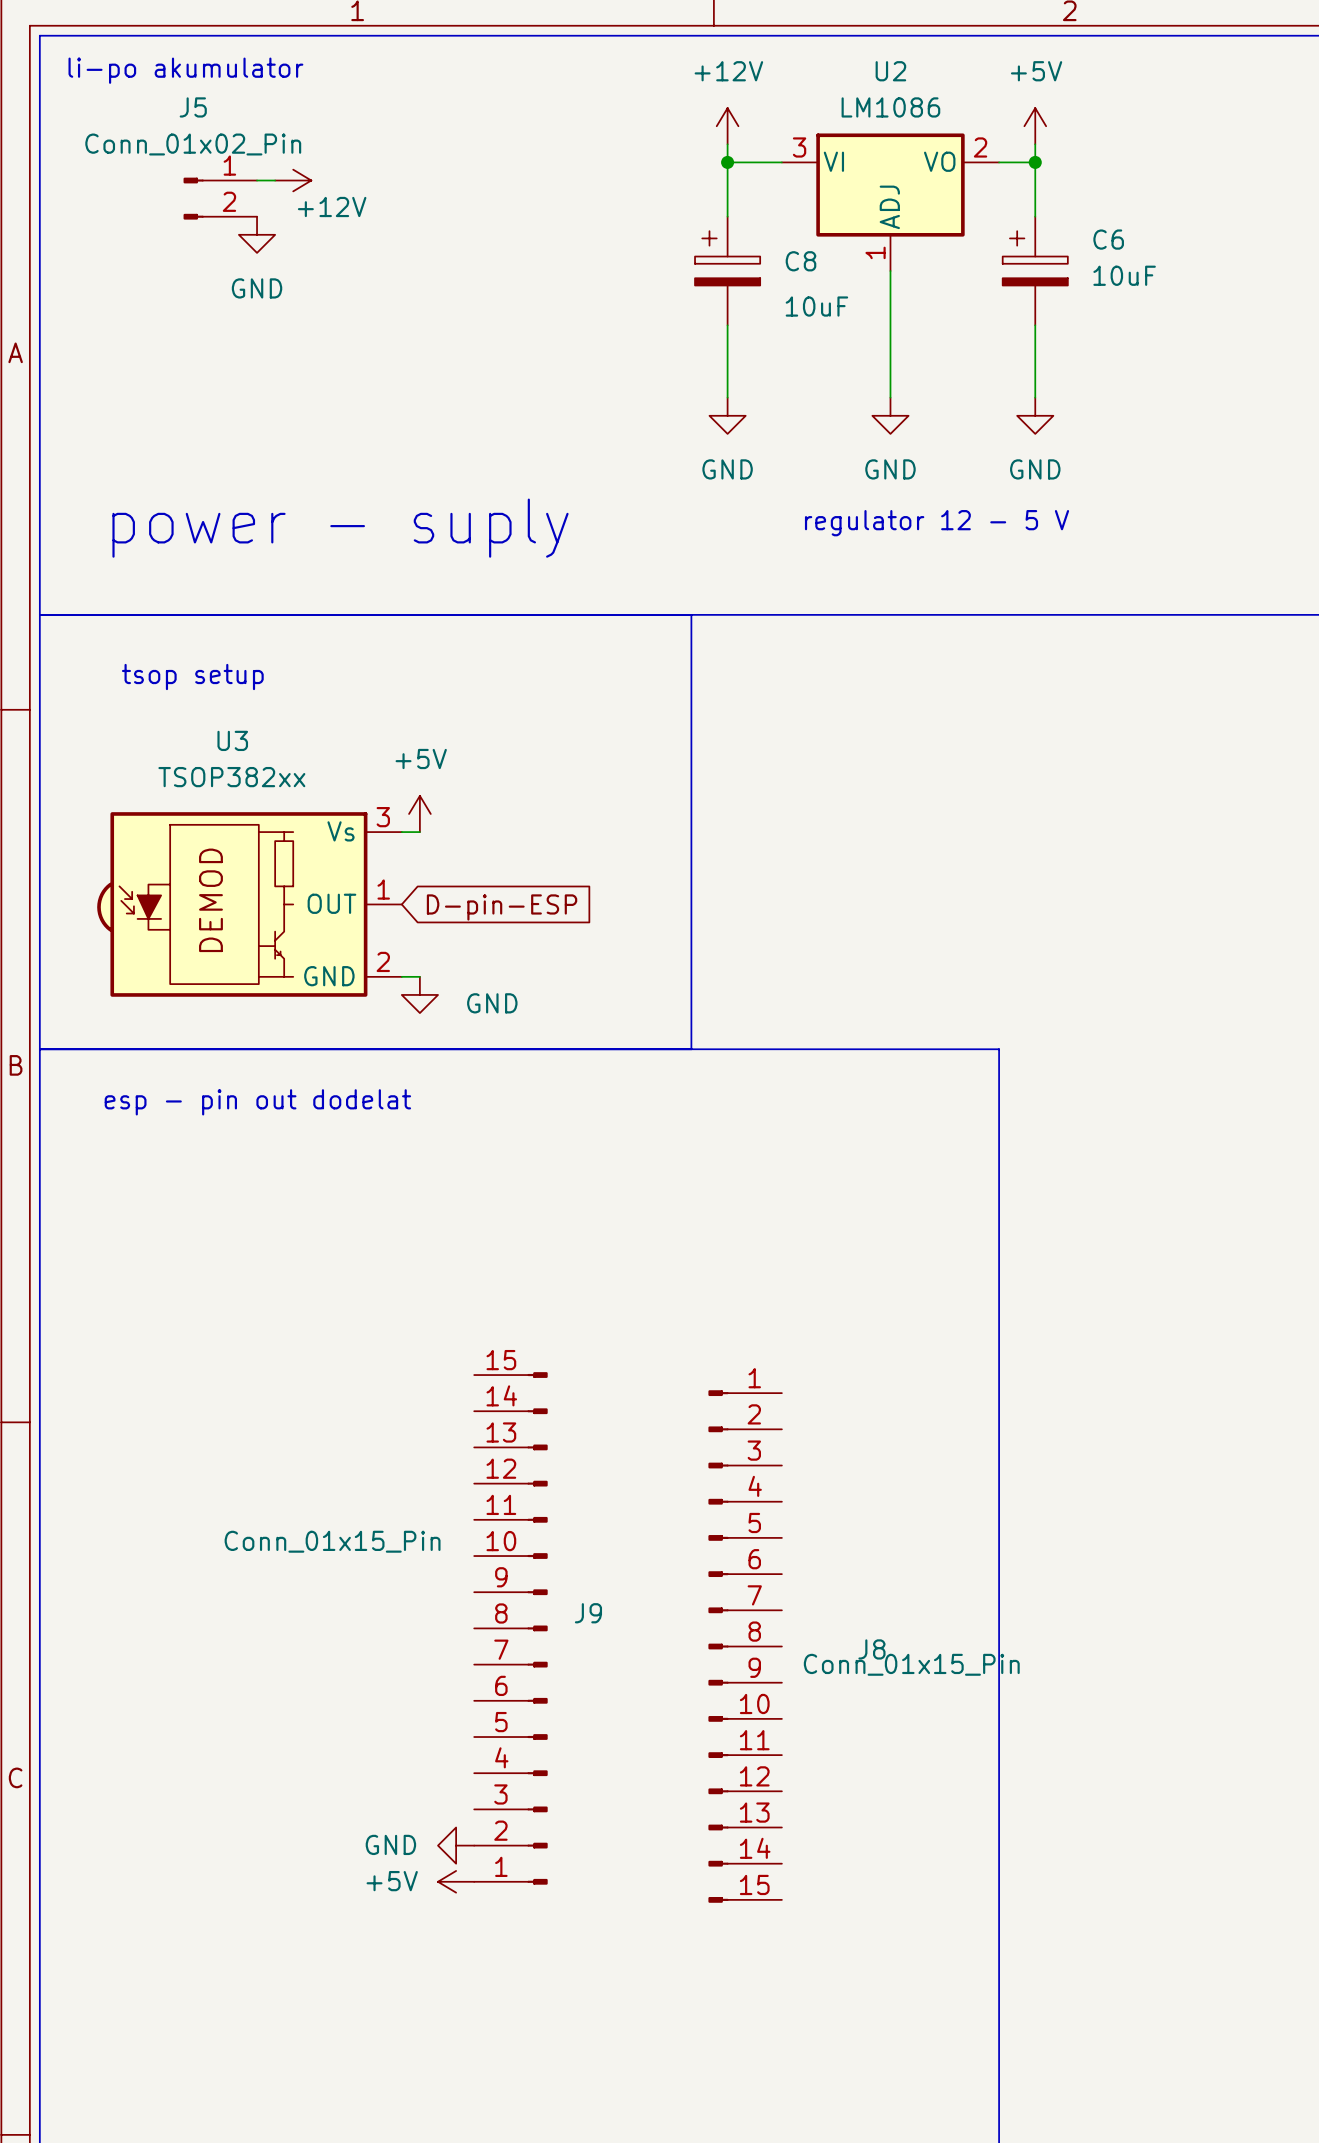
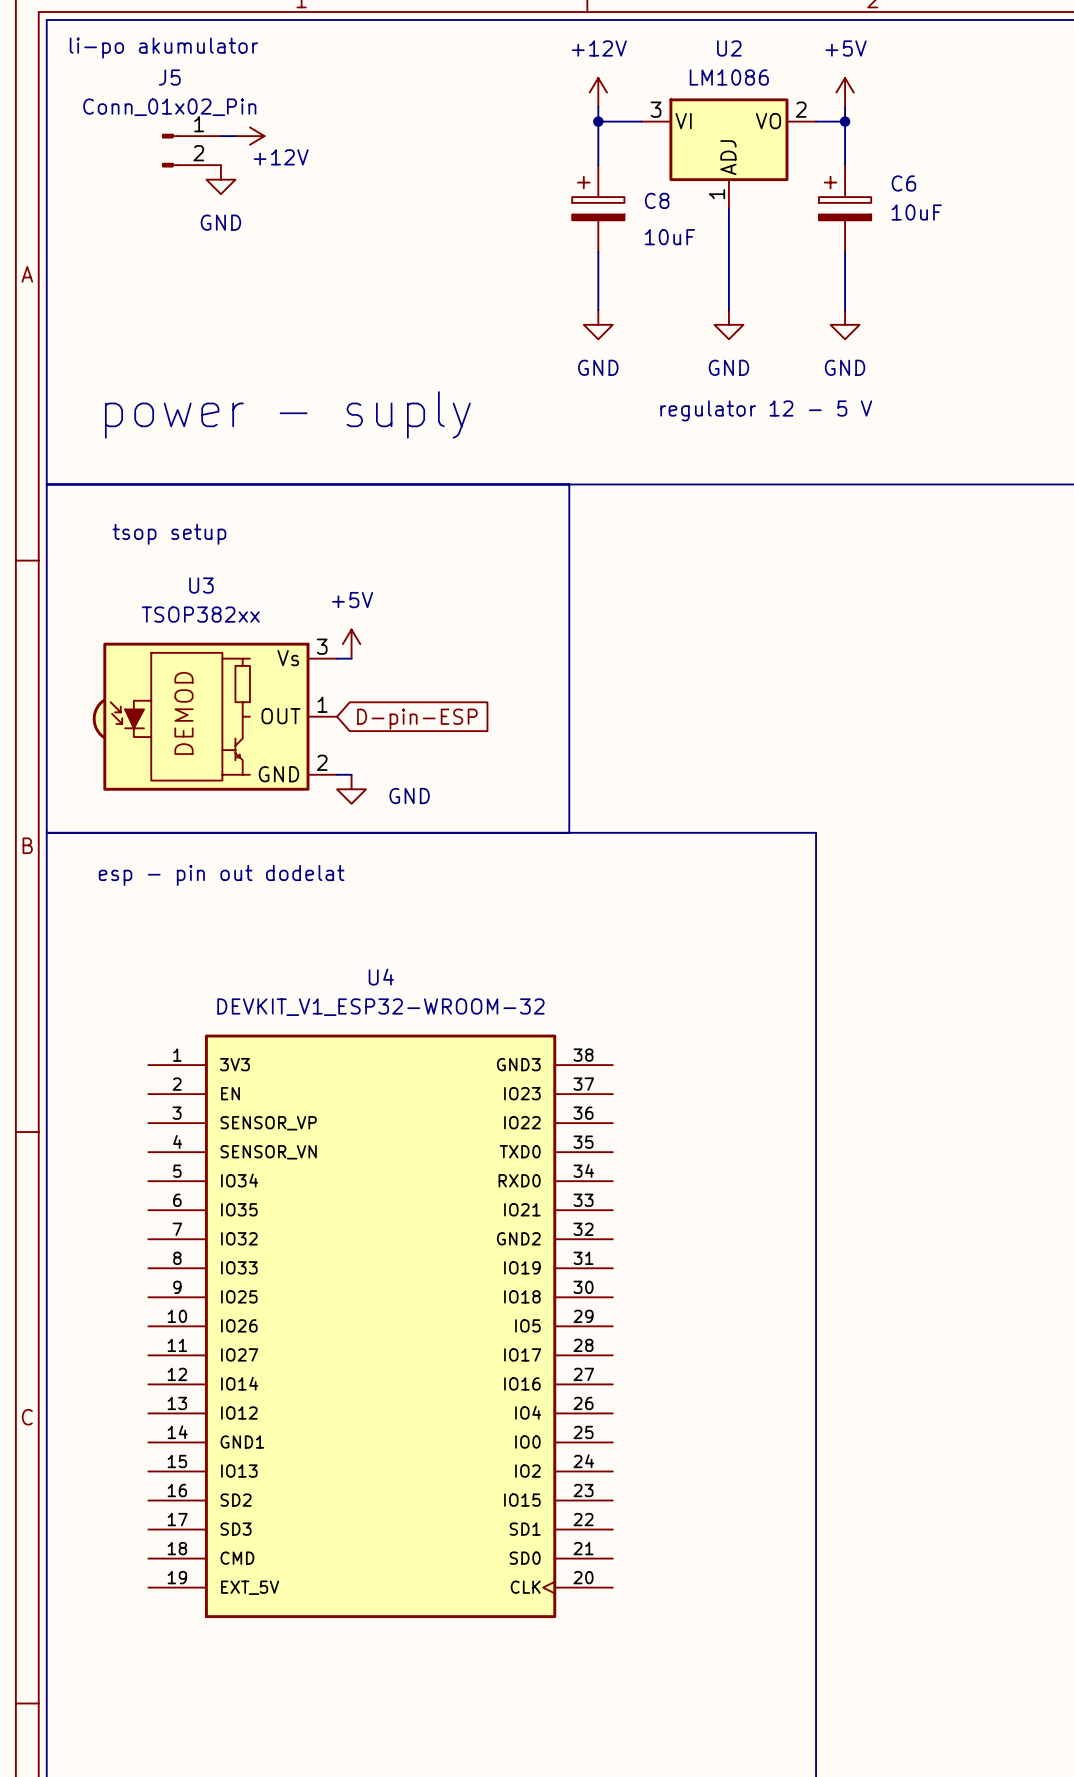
J9: Conn_01x15_Pin (510, 1628) -> none
J8: Conn_01x15_Pin (745, 1646) -> none
U4: none -> DEVKIT_V1_ESP32-WROOM-32 (380, 1326)
power symbol: GND (456, 1845) -> none
power symbol: +5V (456, 1881) -> none

